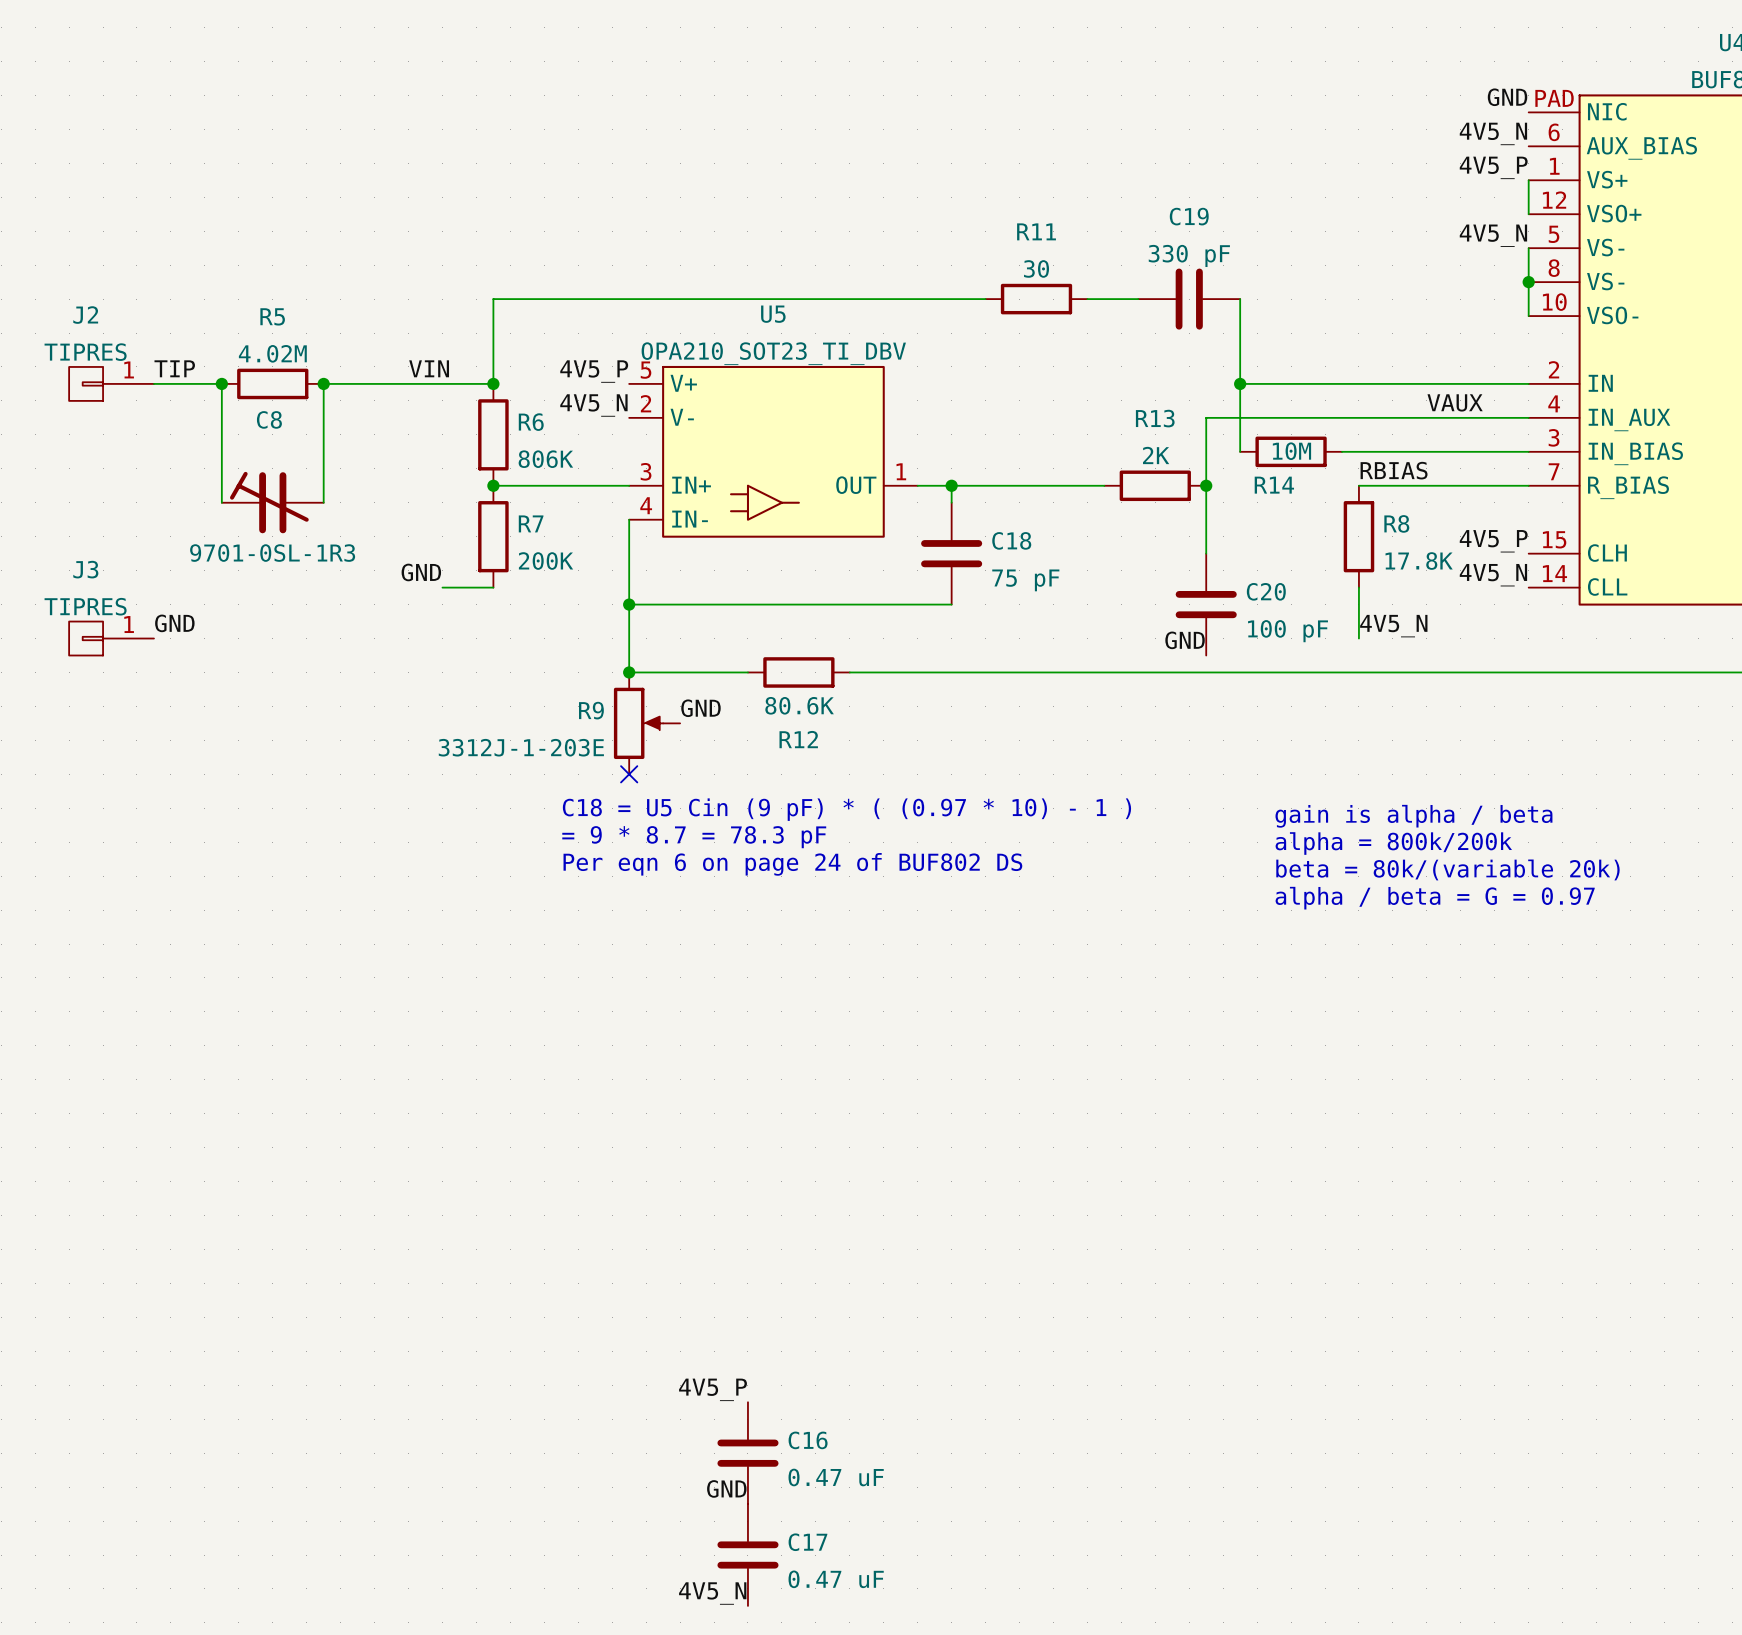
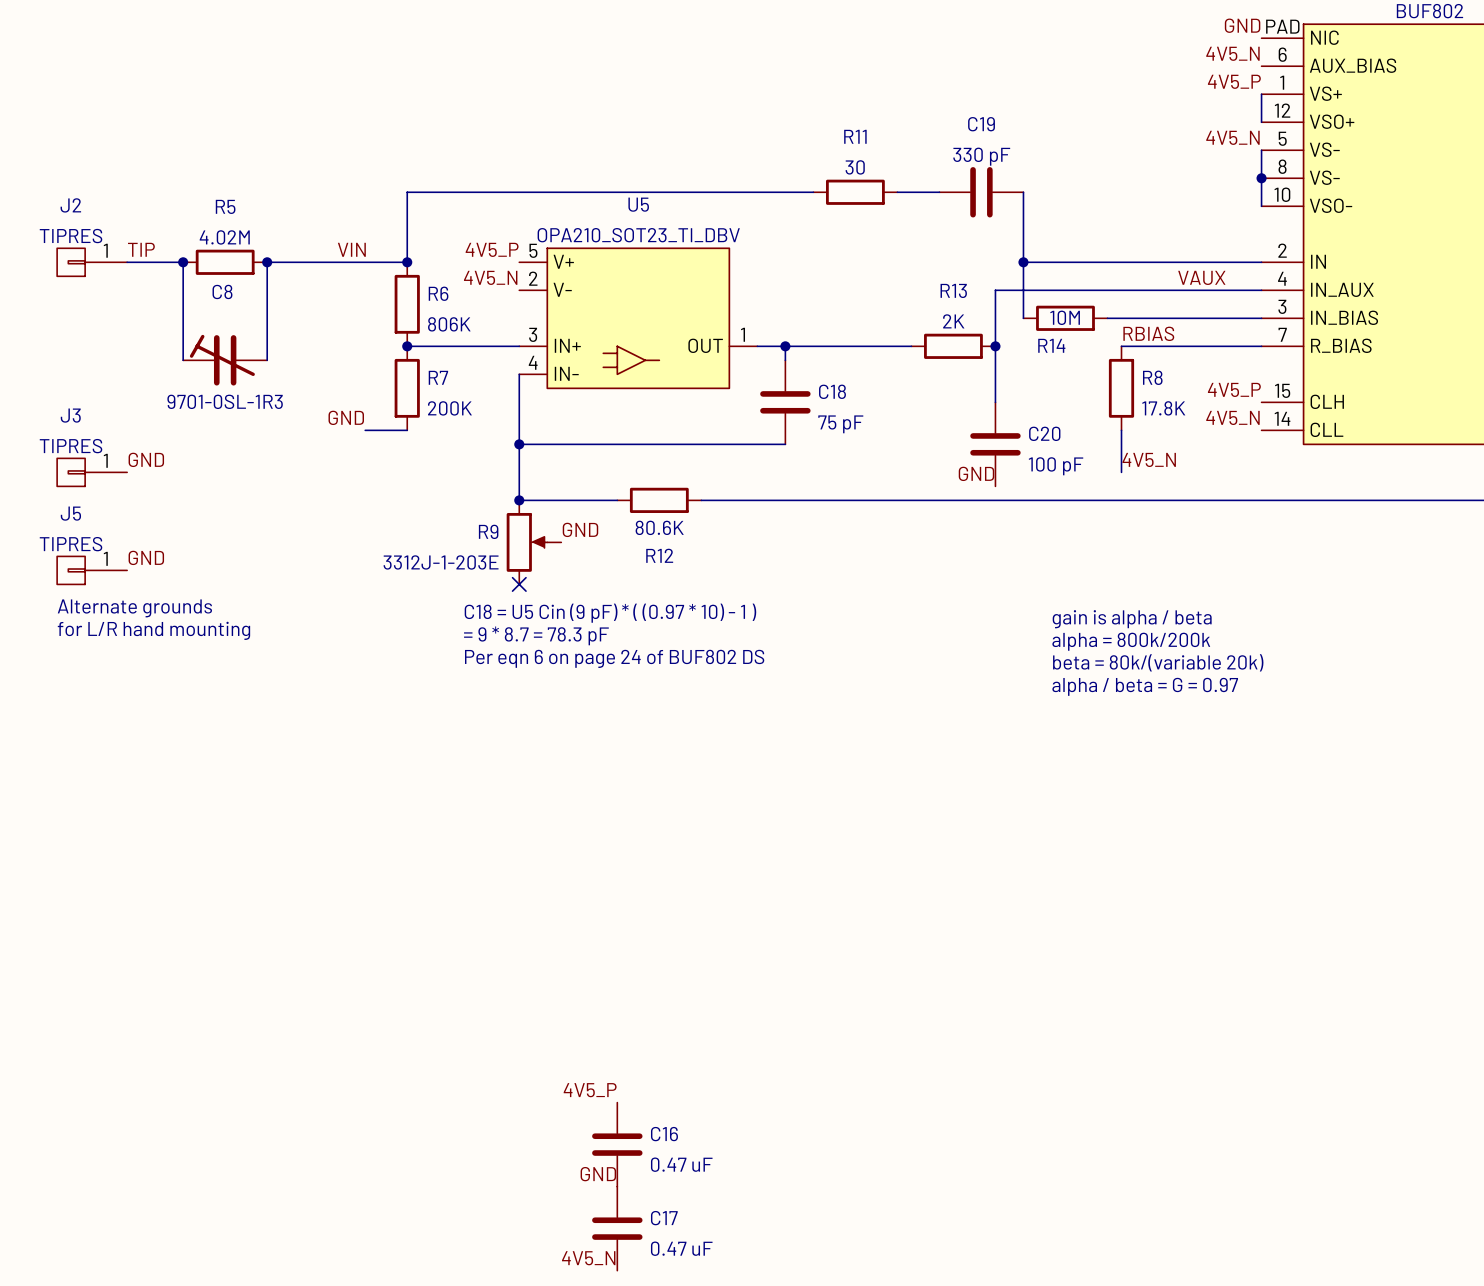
label: none -> GND (146, 557)
J5: none -> TIPRES (92, 570)
text: none -> Alternate grounds (134, 608)
text: none -> for L/R hand mounting (153, 630)

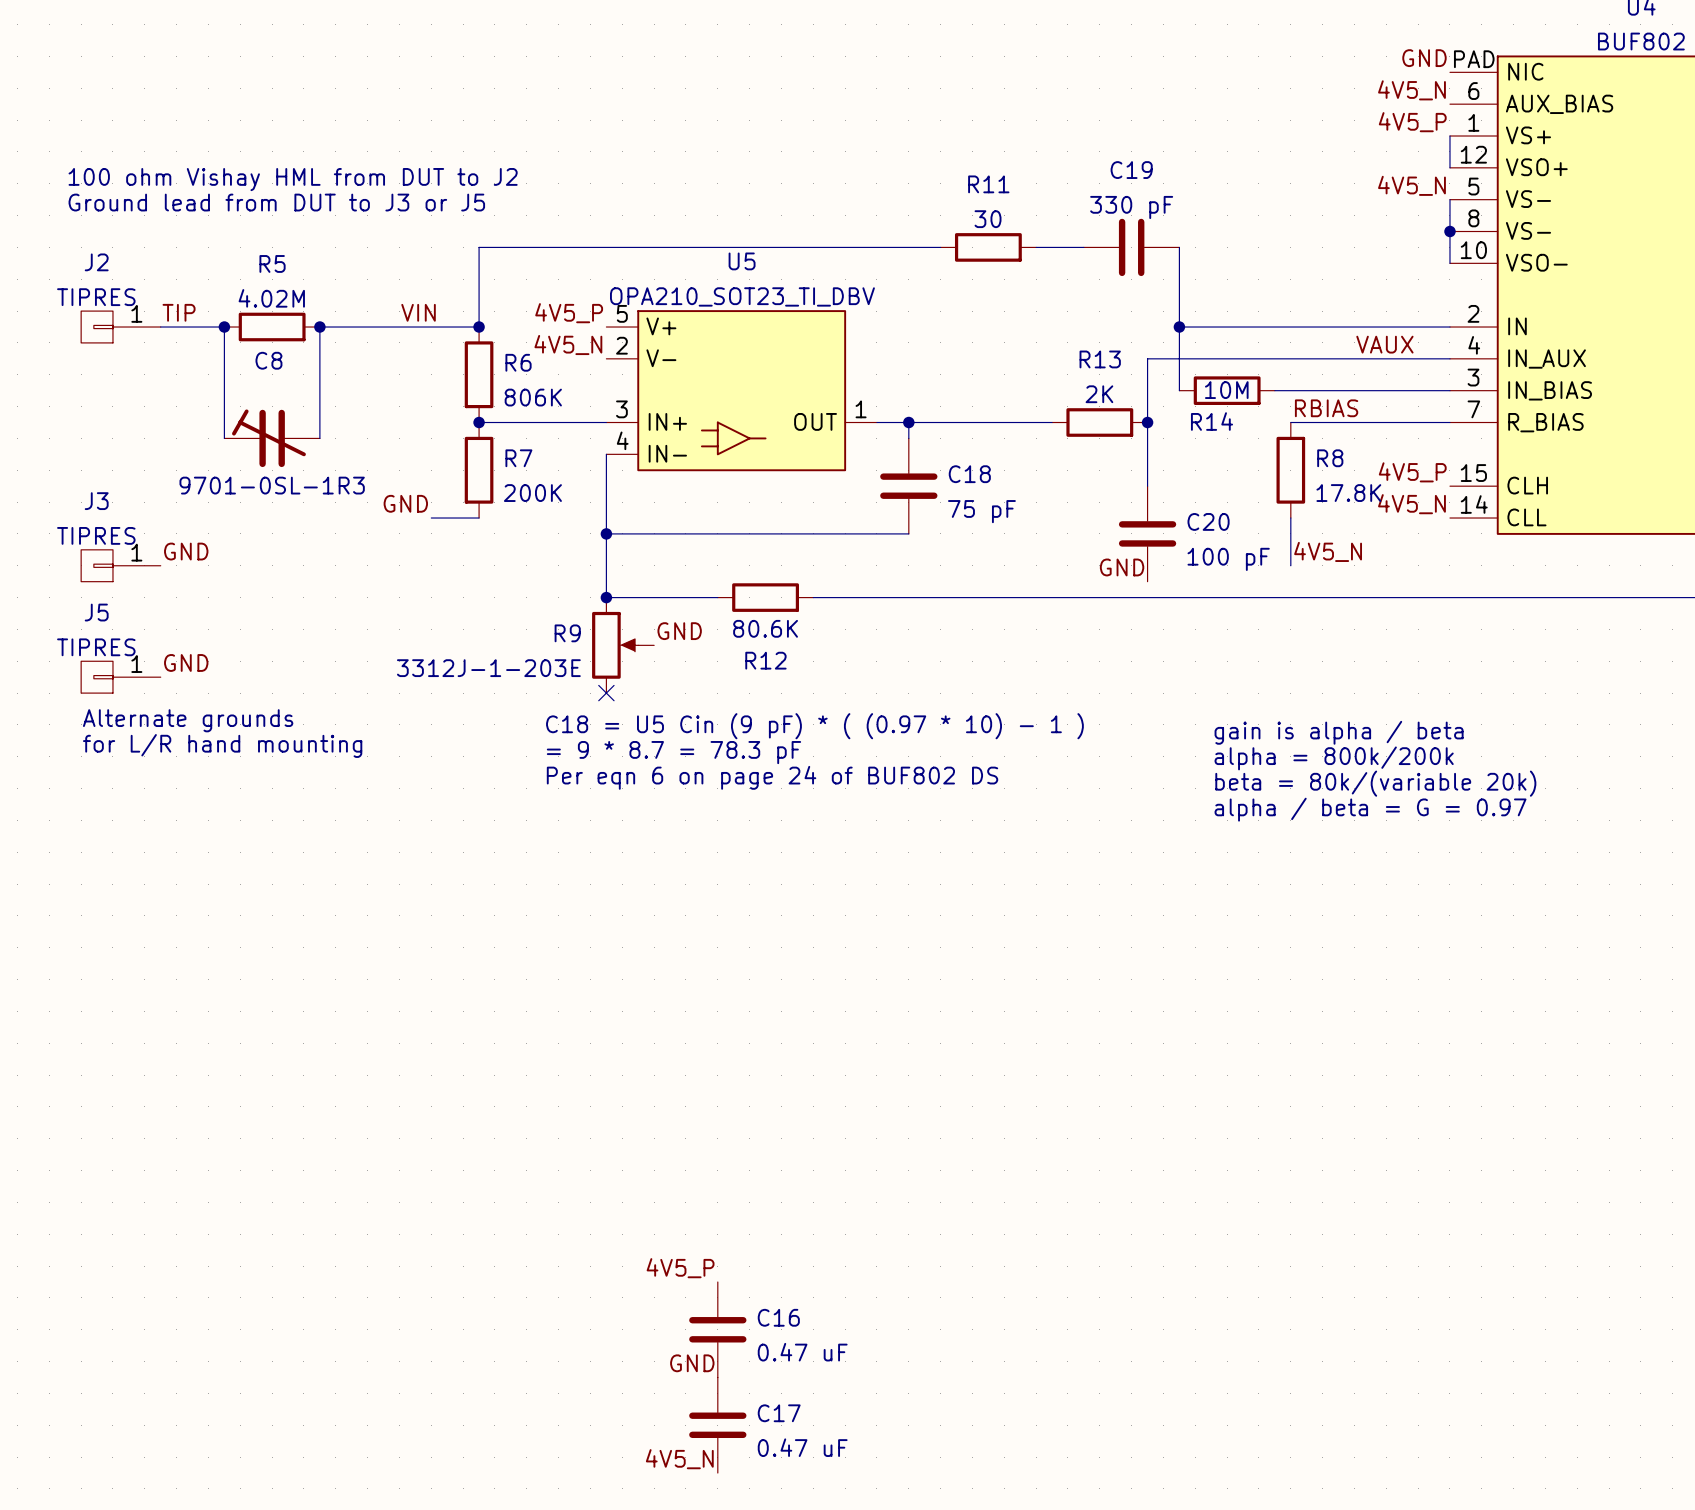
text: none -> 100 ohm Vishay HML from DUT to J2 (293, 179)
text: none -> Ground lead from DUT to J3 or J5 (276, 202)

